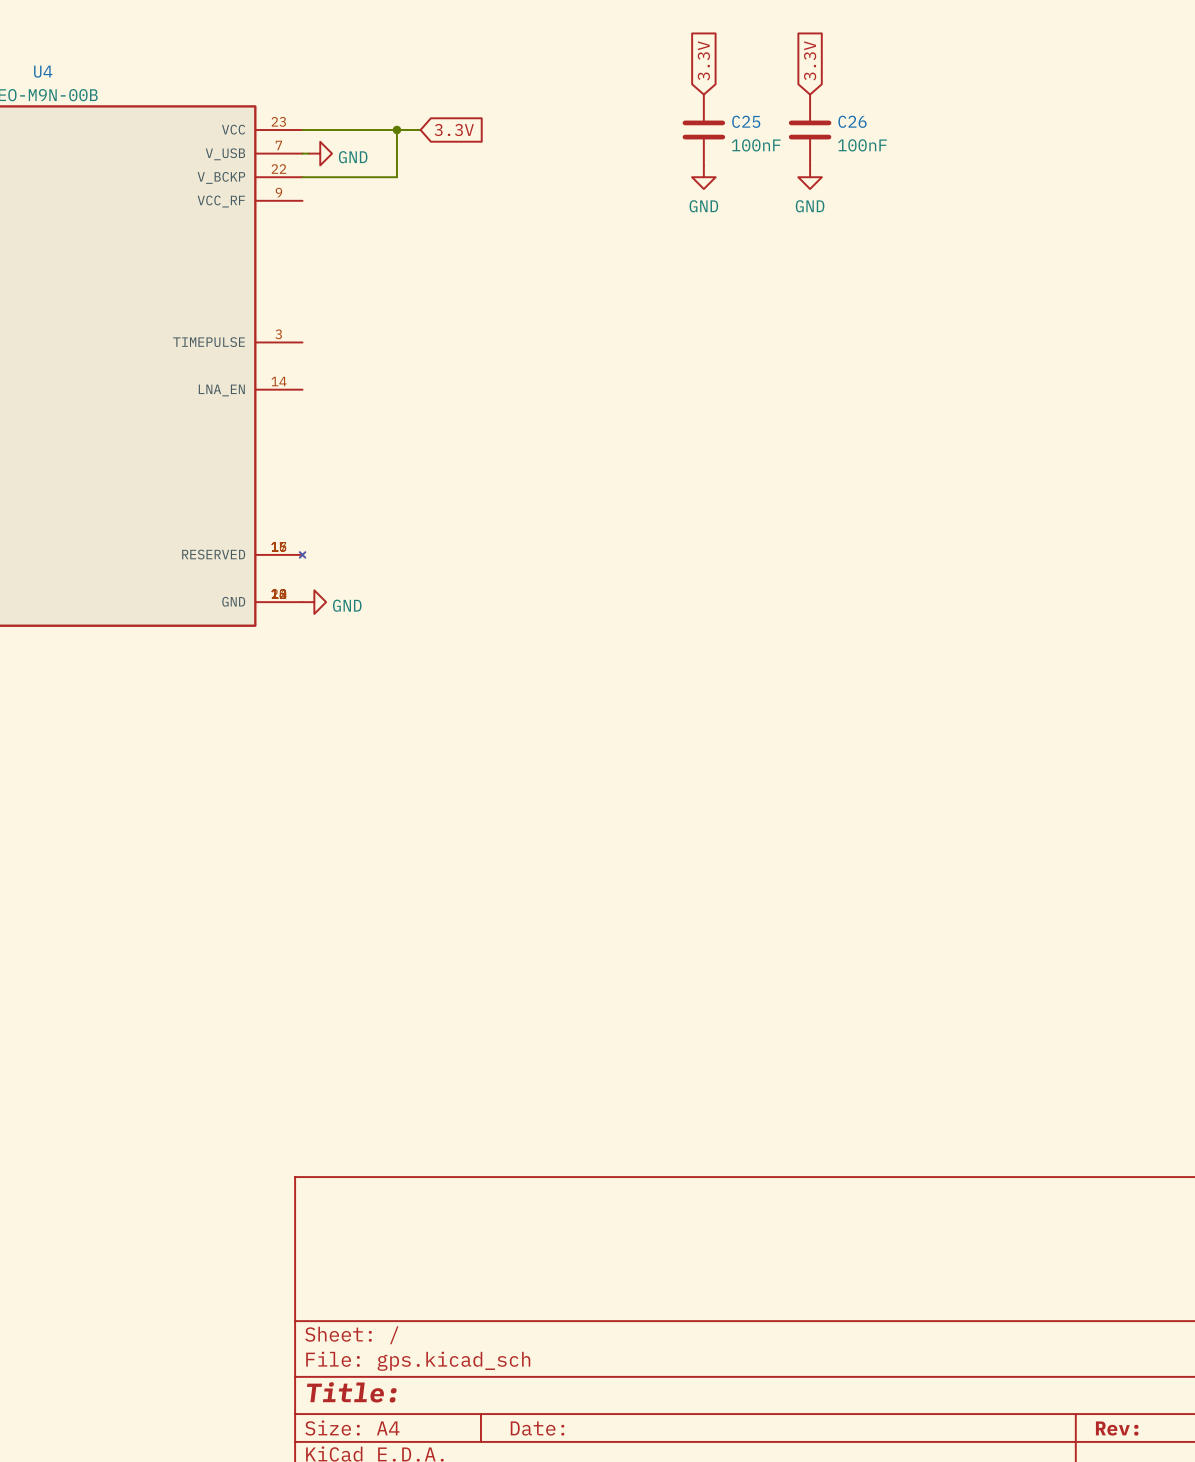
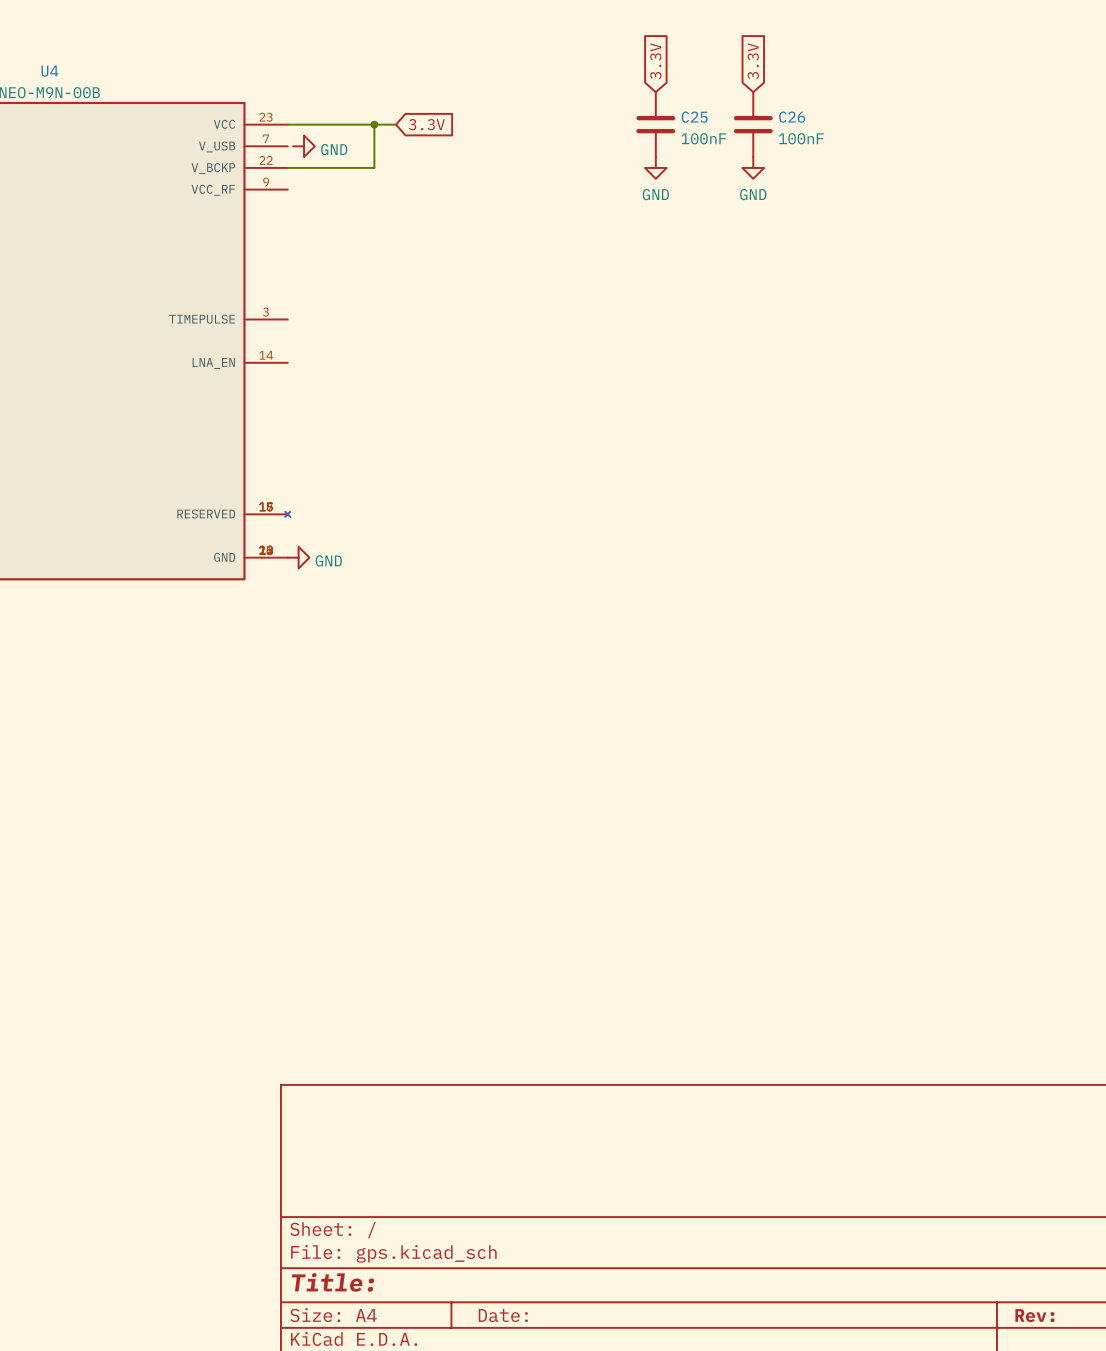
wire: (302, 153) (308, 153) -> none

